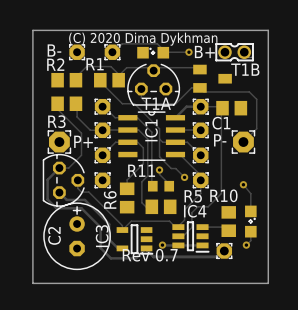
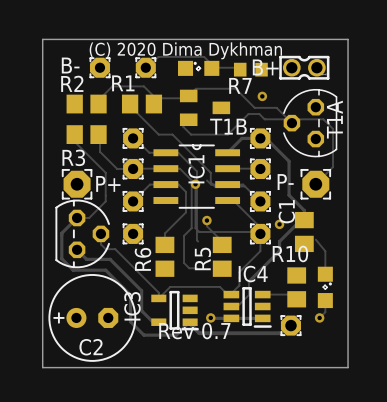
via position: (188, 52) -> (262, 96)
R7: none -> (250, 69)
track: (199, 69) (198, 67) (156, 67) (153, 70) (150, 67) (126, 67) (118, 75) -> none
T1B name position: T1B (245, 69) -> T1B (228, 126)
T1B position: (212, 78) -> (205, 107)
track: none -> (153, 104) (159, 98) (186, 98) (195, 88) (235, 88) (254, 107) (276, 107) (291, 123)
T1A rotation: 0° (153, 84) -> 90° counterclockwise (310, 123)
T1A position: (153, 84) -> (310, 123)
track: (133, 103) (159, 128) (159, 156) (171, 168) (175, 168) (184, 177) -> (172, 134) (210, 172) (210, 182) (214, 186) (245, 186)
track: (205, 106) (222, 108) (221, 193) (208, 206) (197, 206) (191, 212) (191, 217) -> (266, 138) (289, 161) (289, 195) (304, 210) (304, 220) (299, 222) (279, 241) (279, 251) (248, 281)
C1 rotation: 0° (231, 108) -> 90° clockwise (304, 232)
C1 position: (231, 108) -> (304, 232)
track: none -> (195, 184) (195, 228) (199, 232) (260, 232)
via: none -> (195, 184)
via: none -> (279, 224)
via: (184, 177) -> none
via: (243, 184) -> none
R11: (161, 186) -> none
R5 name position: R5 (193, 196) -> R5 (202, 258)
R5 rotation: 0° (161, 206) -> 90° clockwise (222, 256)
C2 rotation: 0° (77, 236) -> 90° counterclockwise (92, 317)

